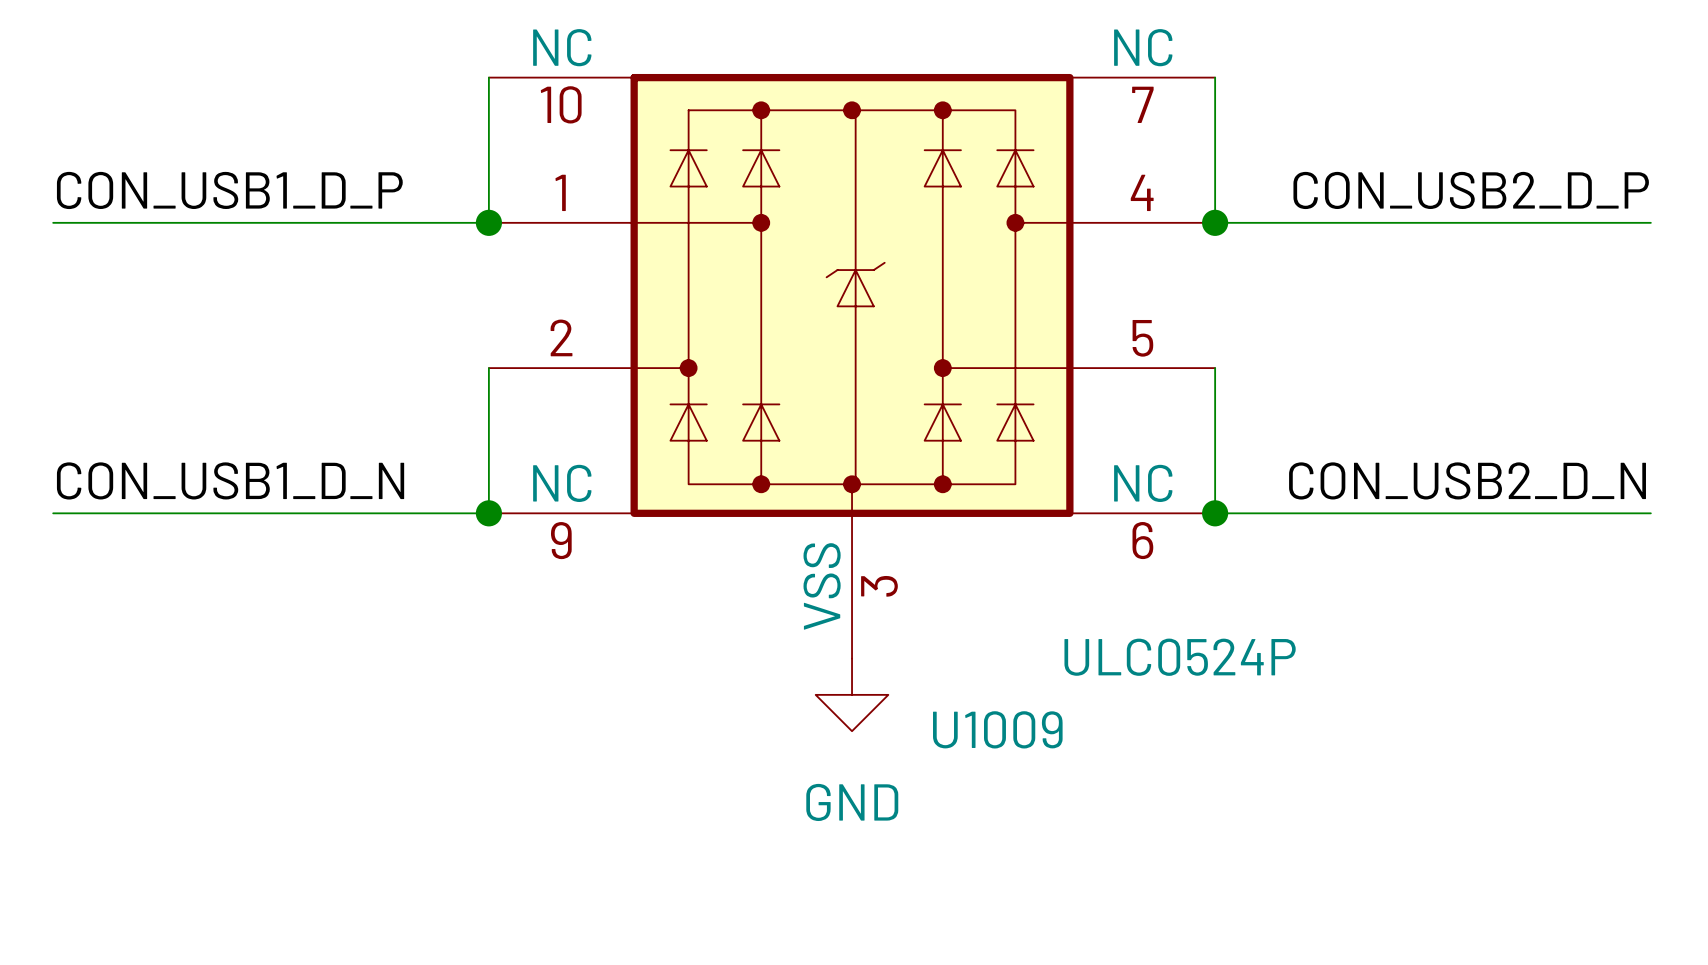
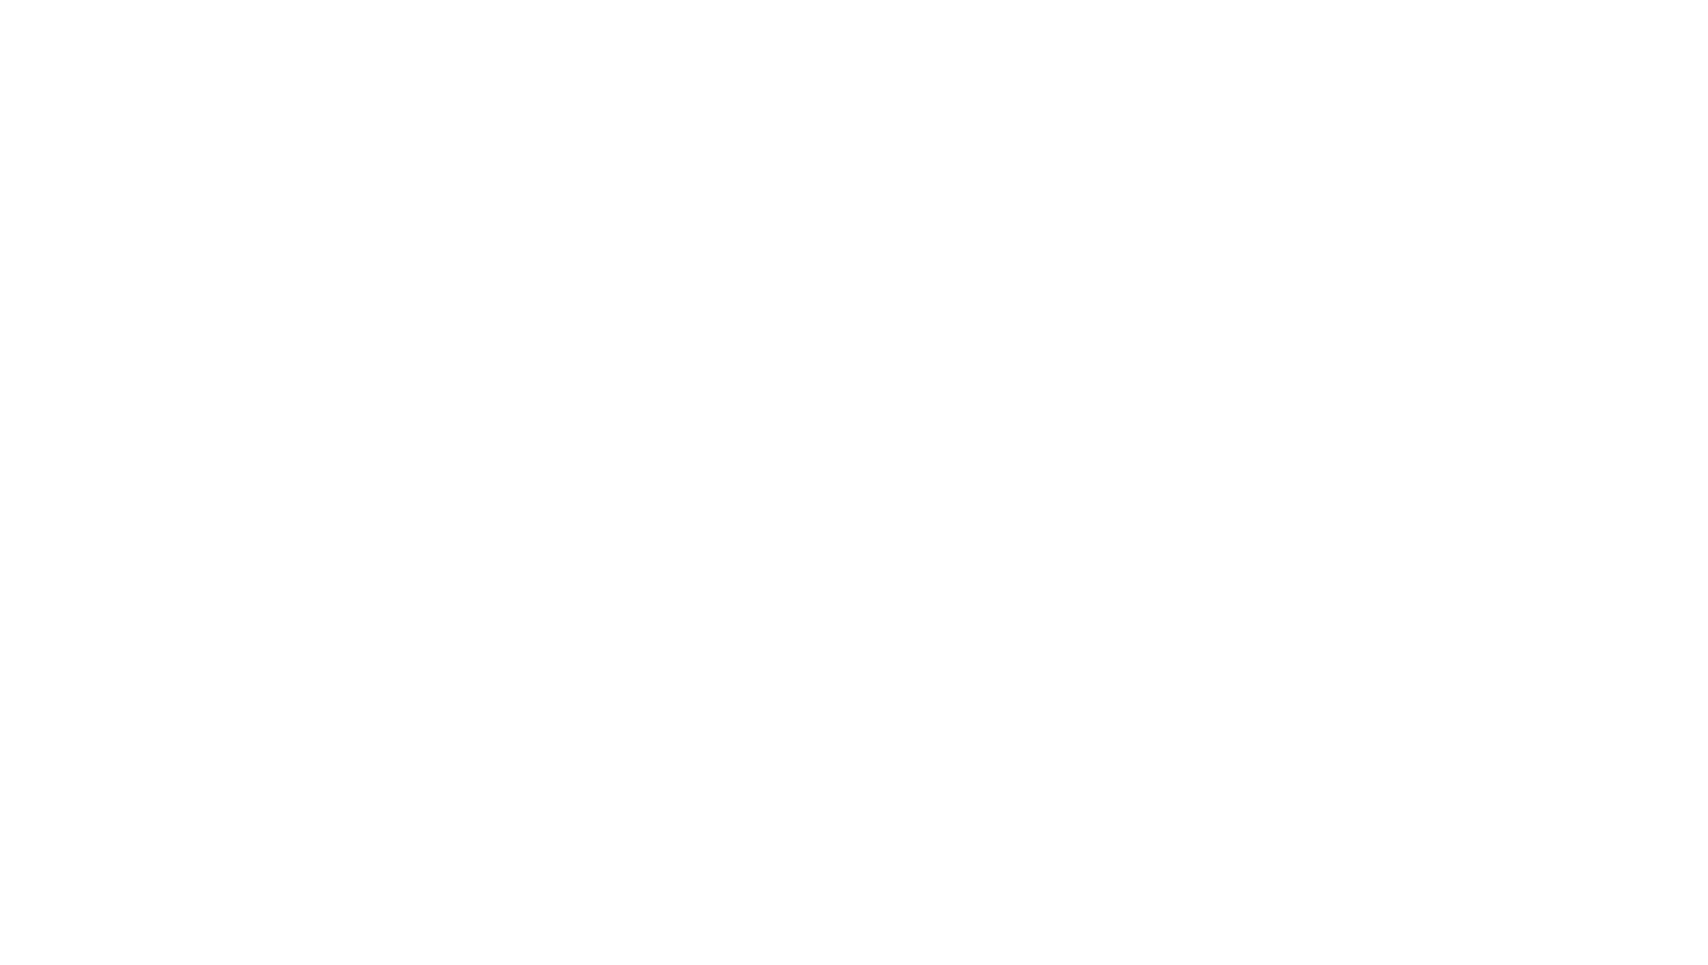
wire: (488, 77) (488, 222) (53, 222) -> none
wire: (1215, 77) (1215, 222) (1650, 222) -> none
label: CON_USB1_D_P (229, 190) -> none
label: CON_USB2_D_P (1471, 190) -> none
junction: (488, 222) -> none
junction: (1215, 222) -> none
U1009: ULC0524P (852, 366) -> none
wire: (488, 368) (488, 513) (53, 513) -> none
wire: (1215, 368) (1215, 513) (1650, 513) -> none
label: CON_USB1_D_N (230, 480) -> none
label: CON_USB2_D_N (1467, 480) -> none
junction: (488, 513) -> none
junction: (1215, 513) -> none
power symbol: GND (852, 694) -> none

